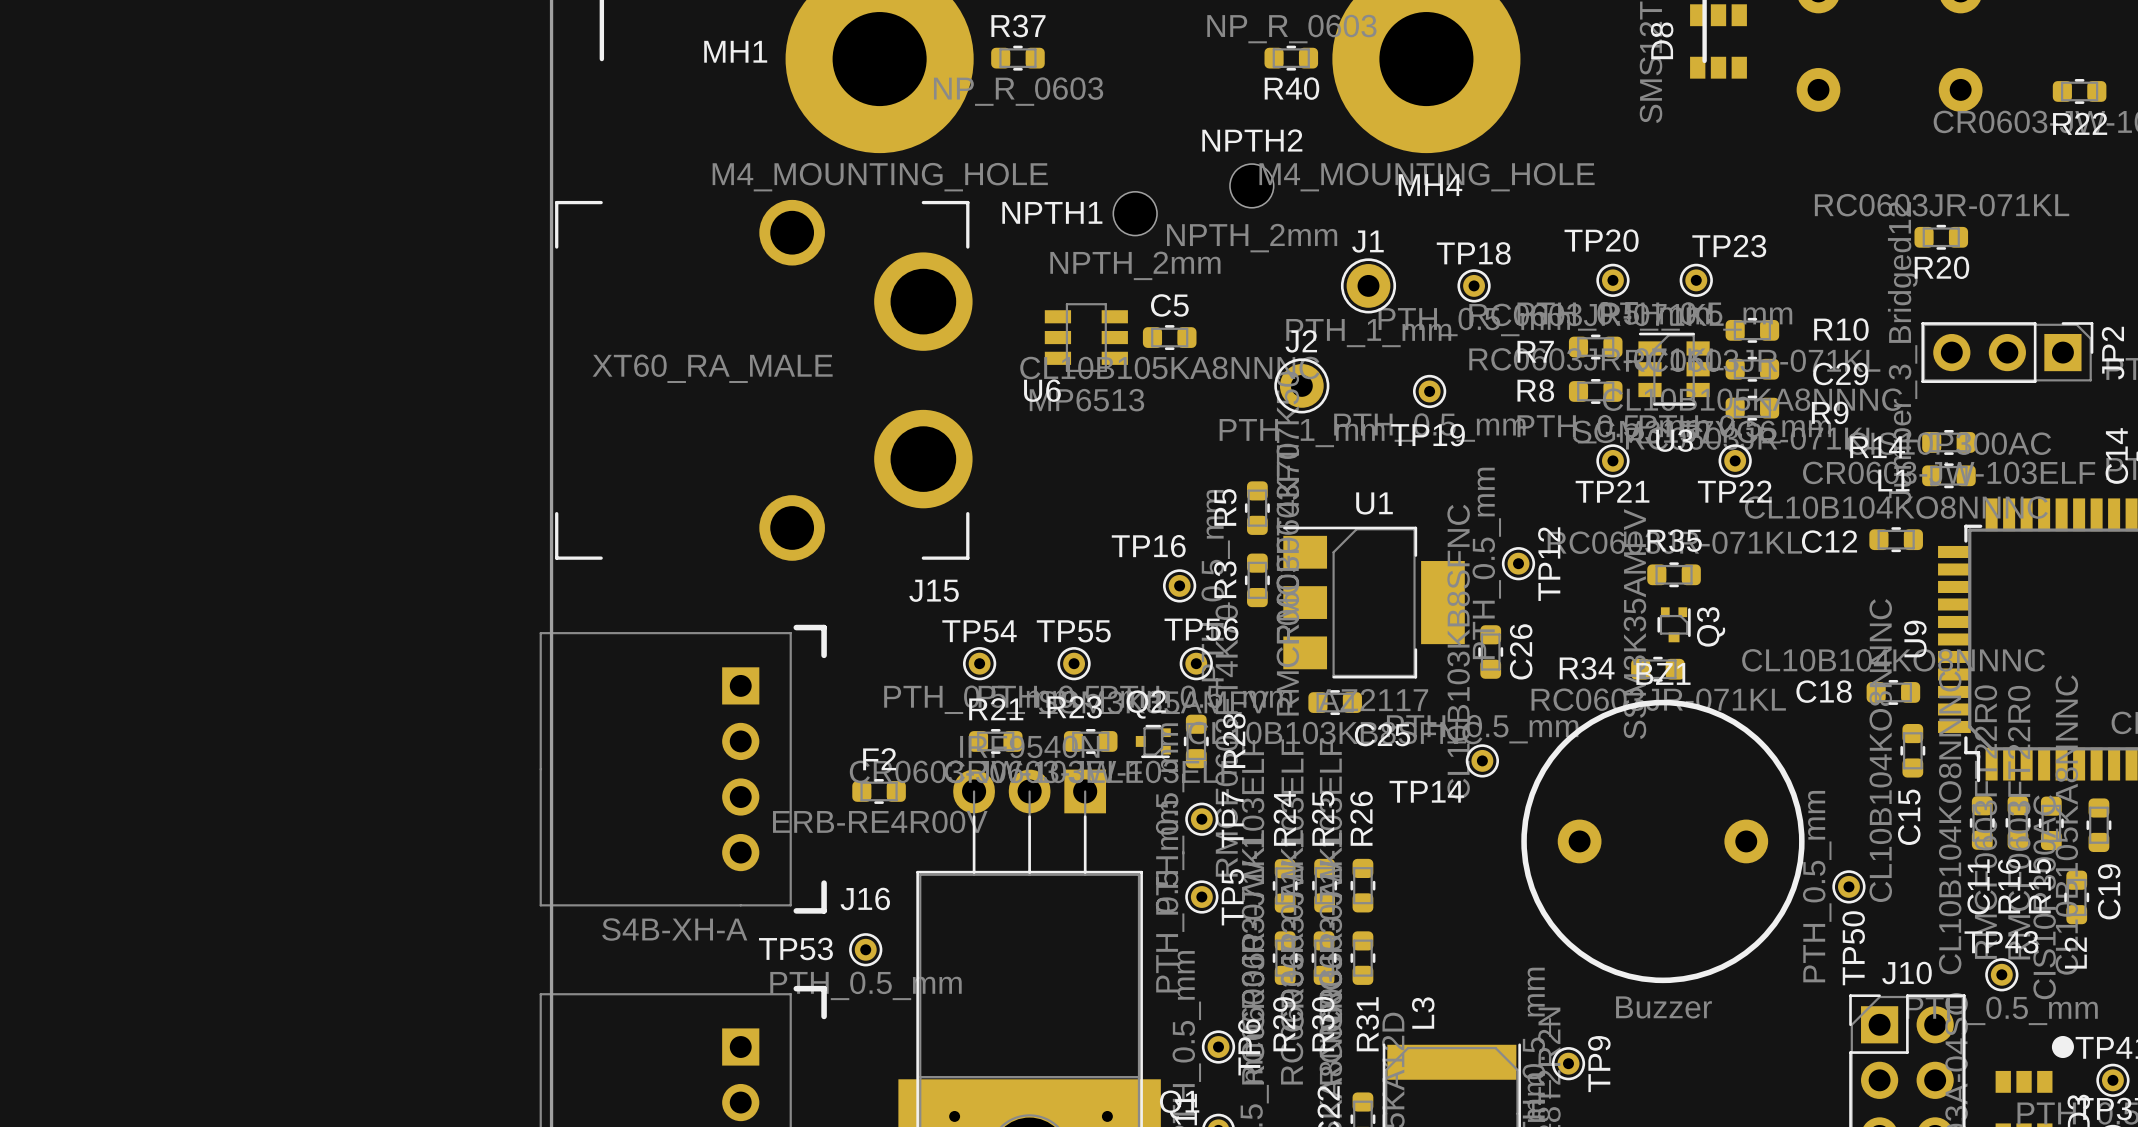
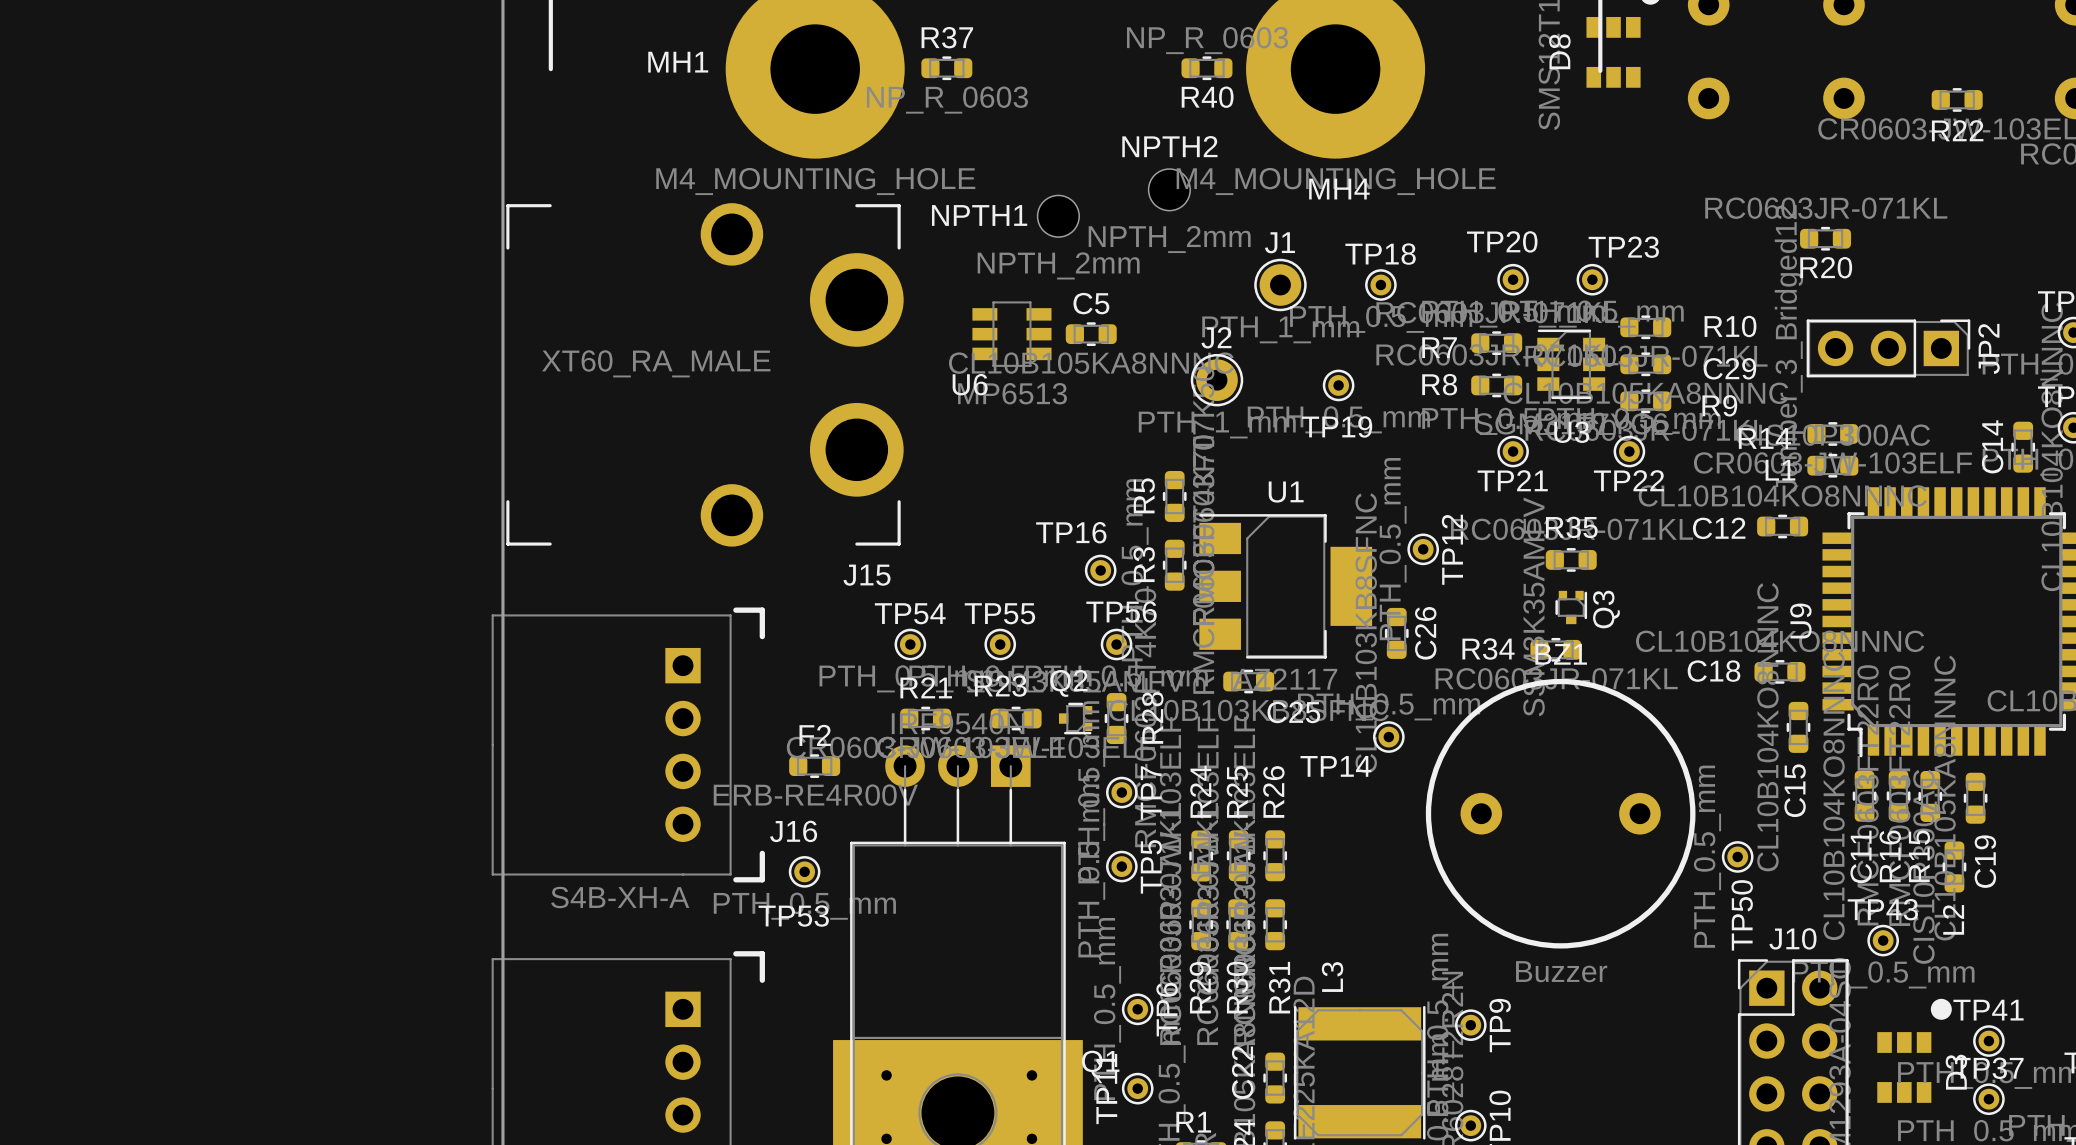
J16 name position: J16 (865, 898) -> J16 (793, 831)
TP53 name position: TP53 (795, 948) -> TP53 (793, 916)
TP53 position: (865, 949) -> (804, 871)

